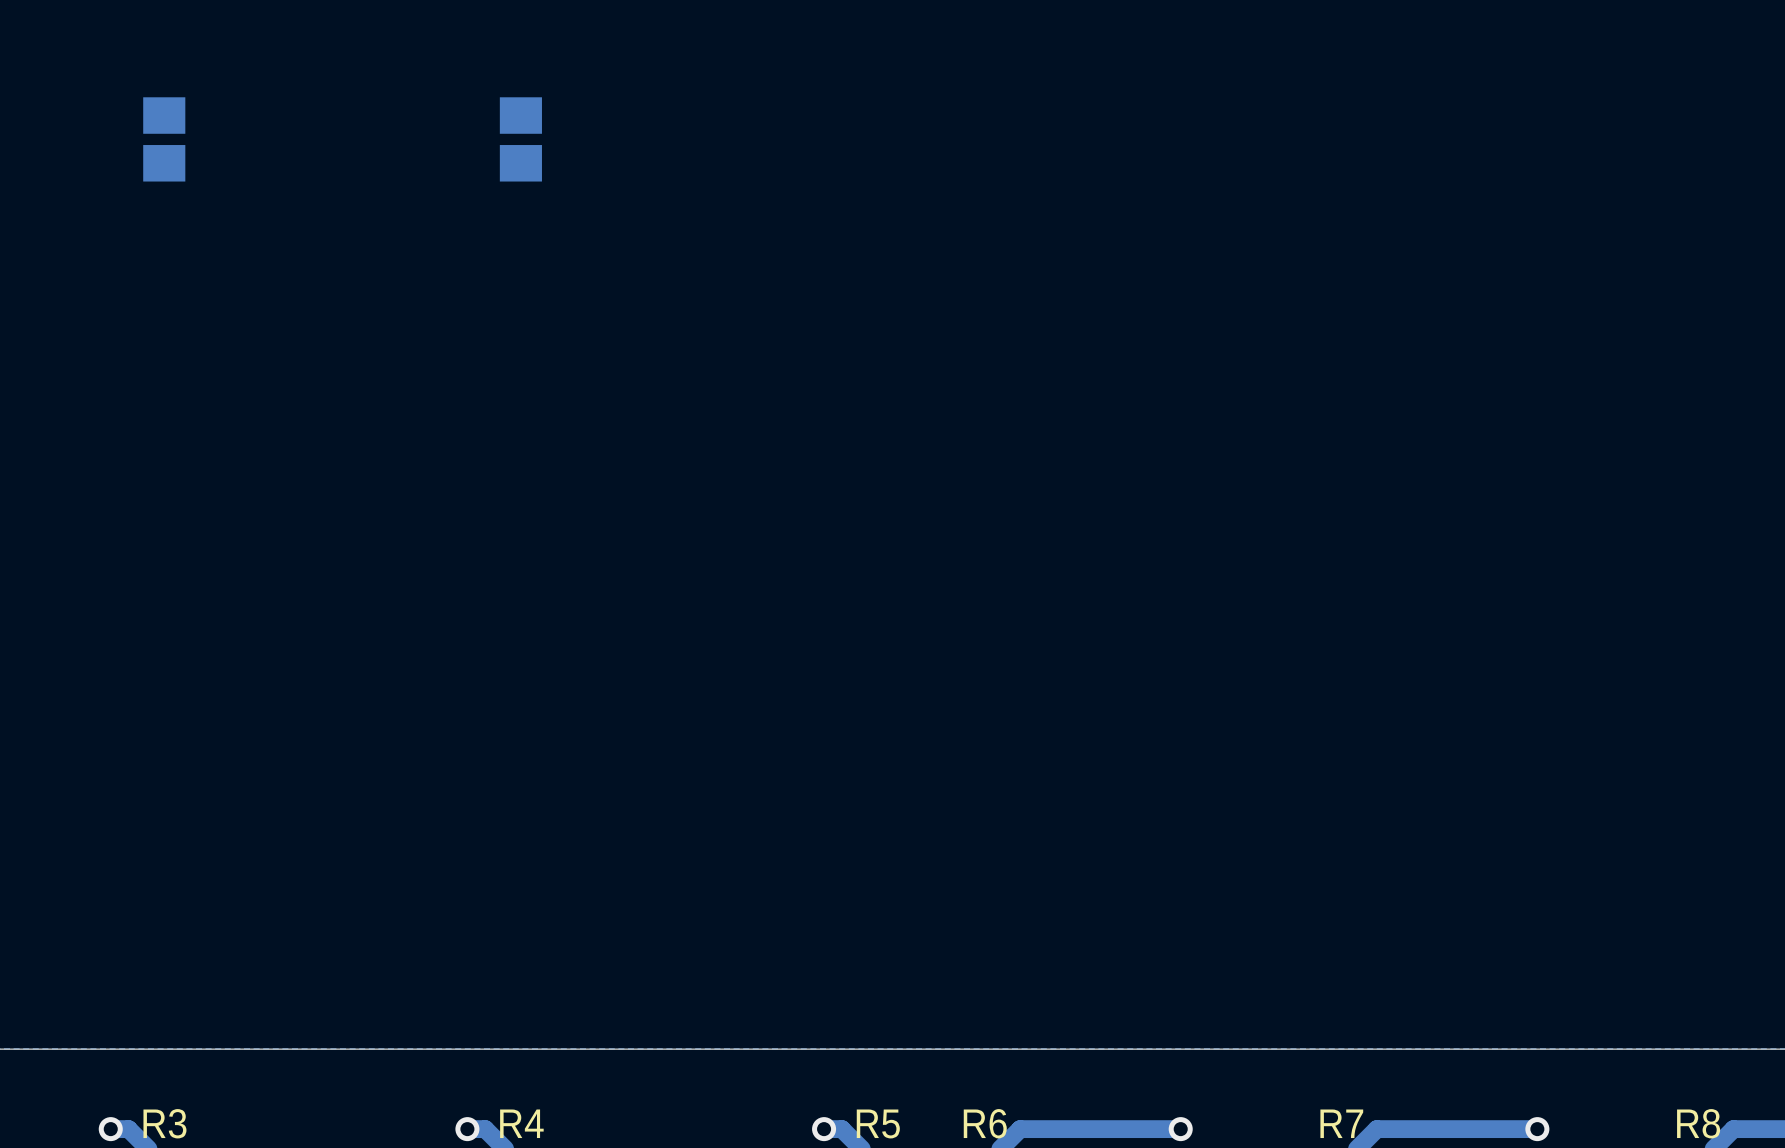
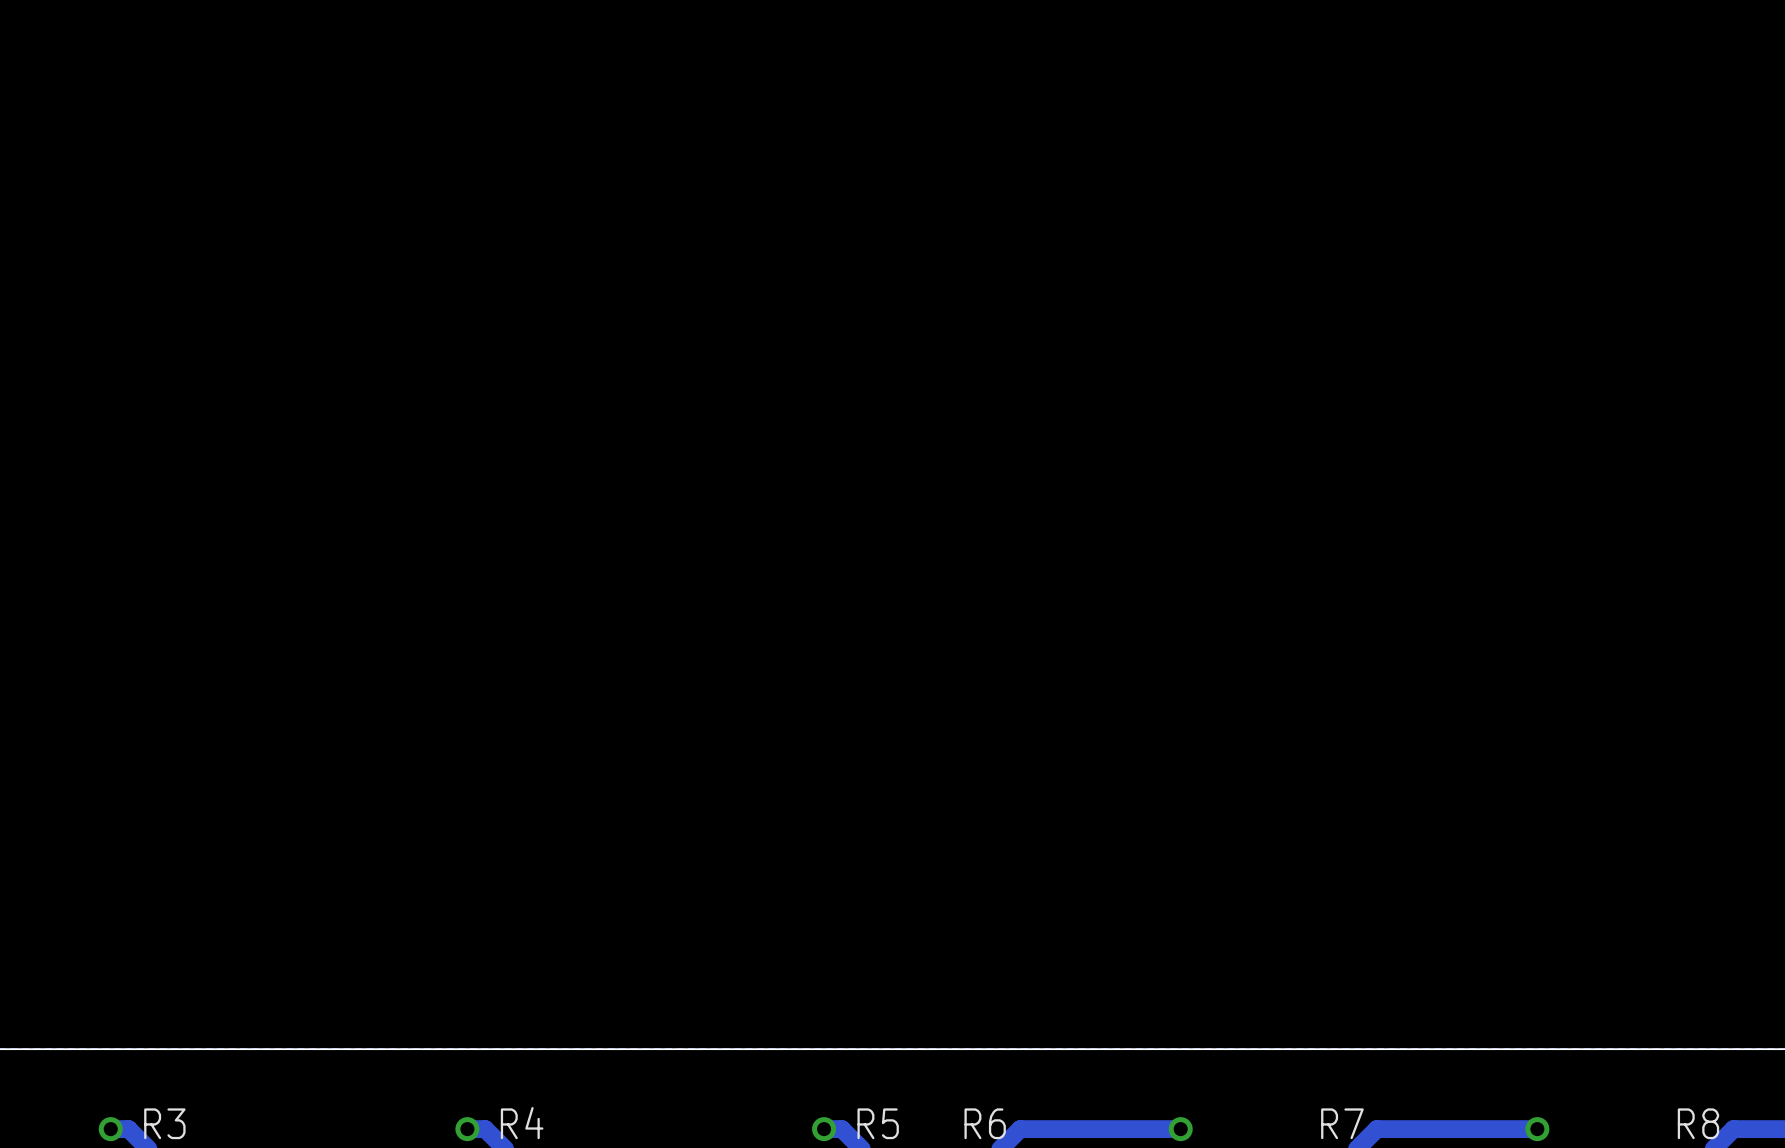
part: (164, 139) -> none
part: (520, 139) -> none

